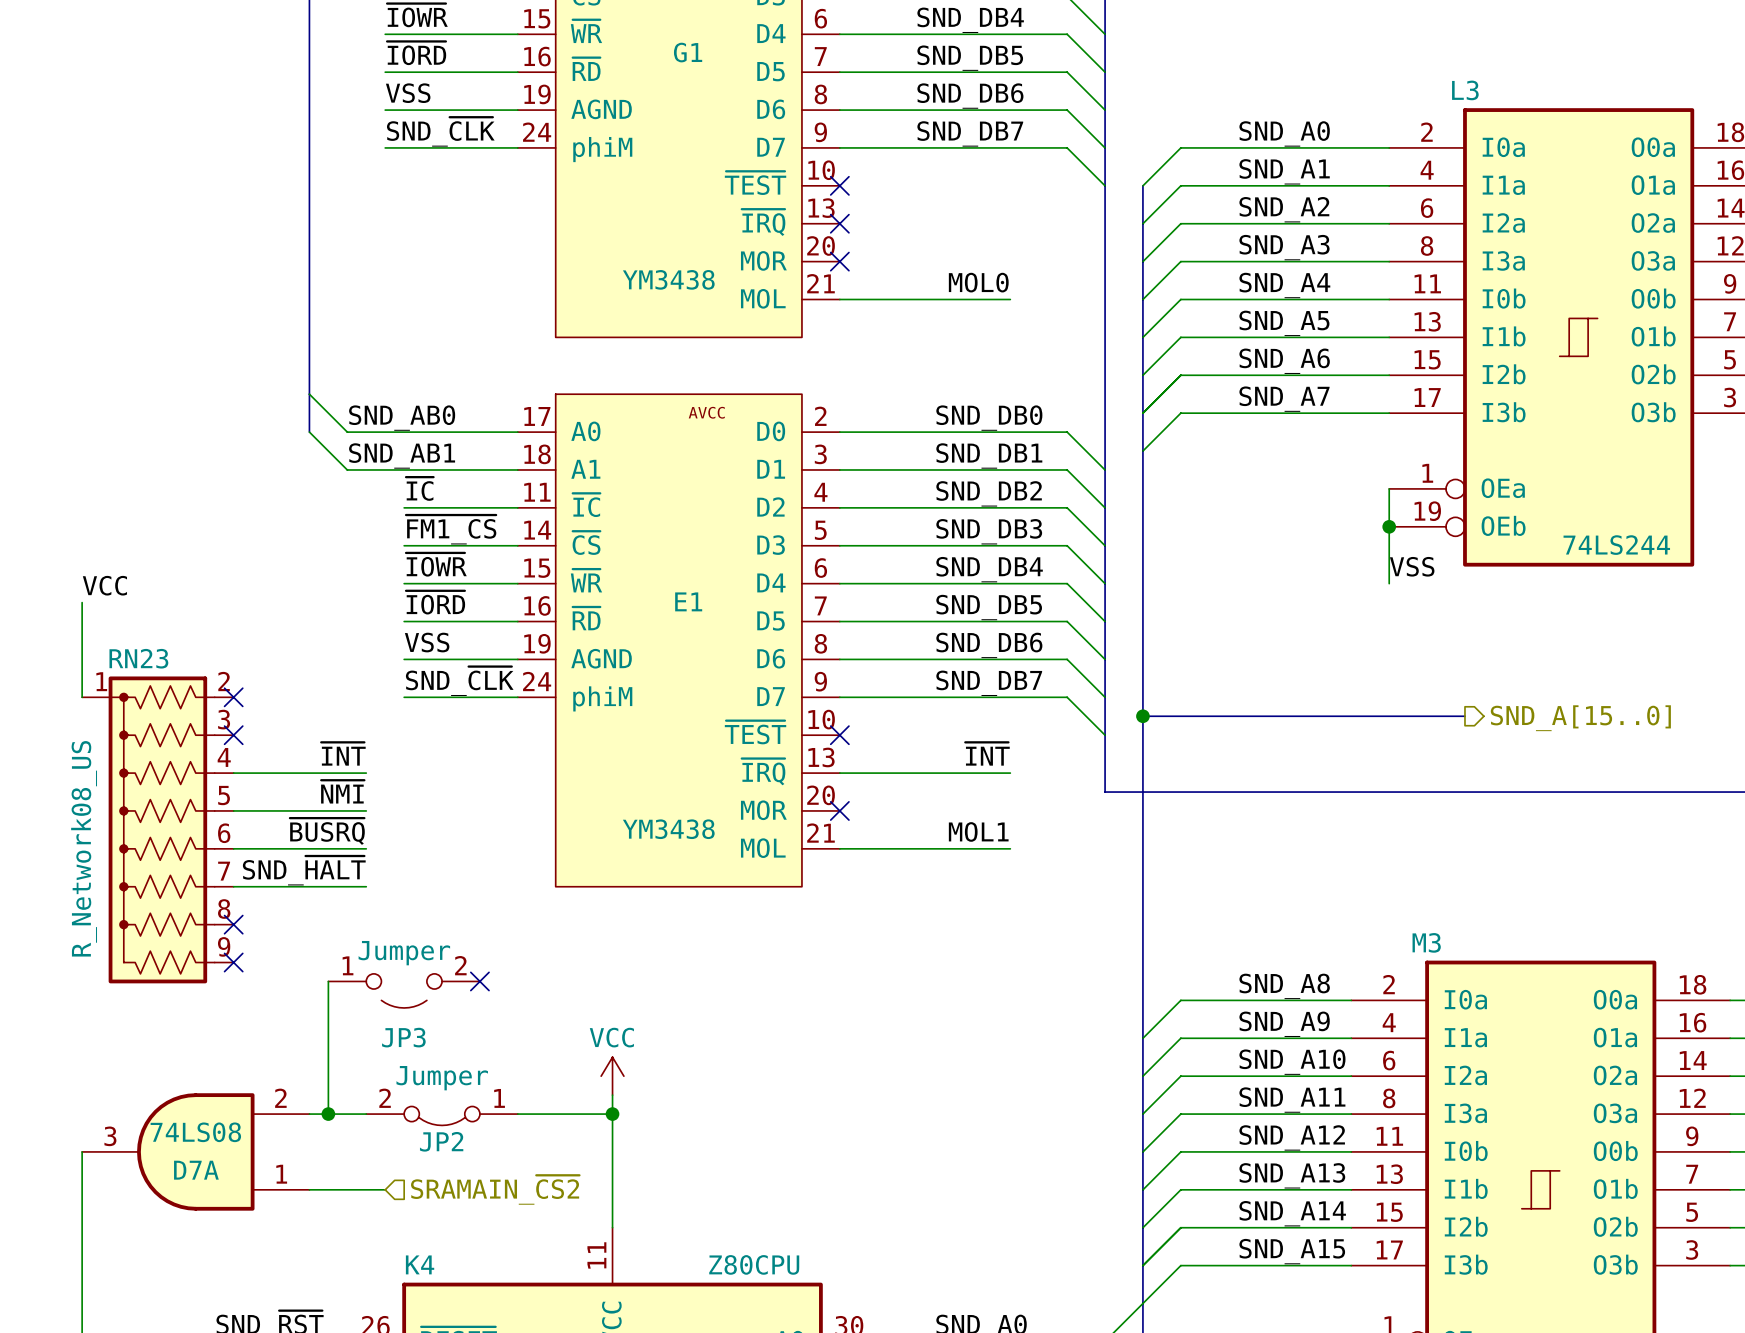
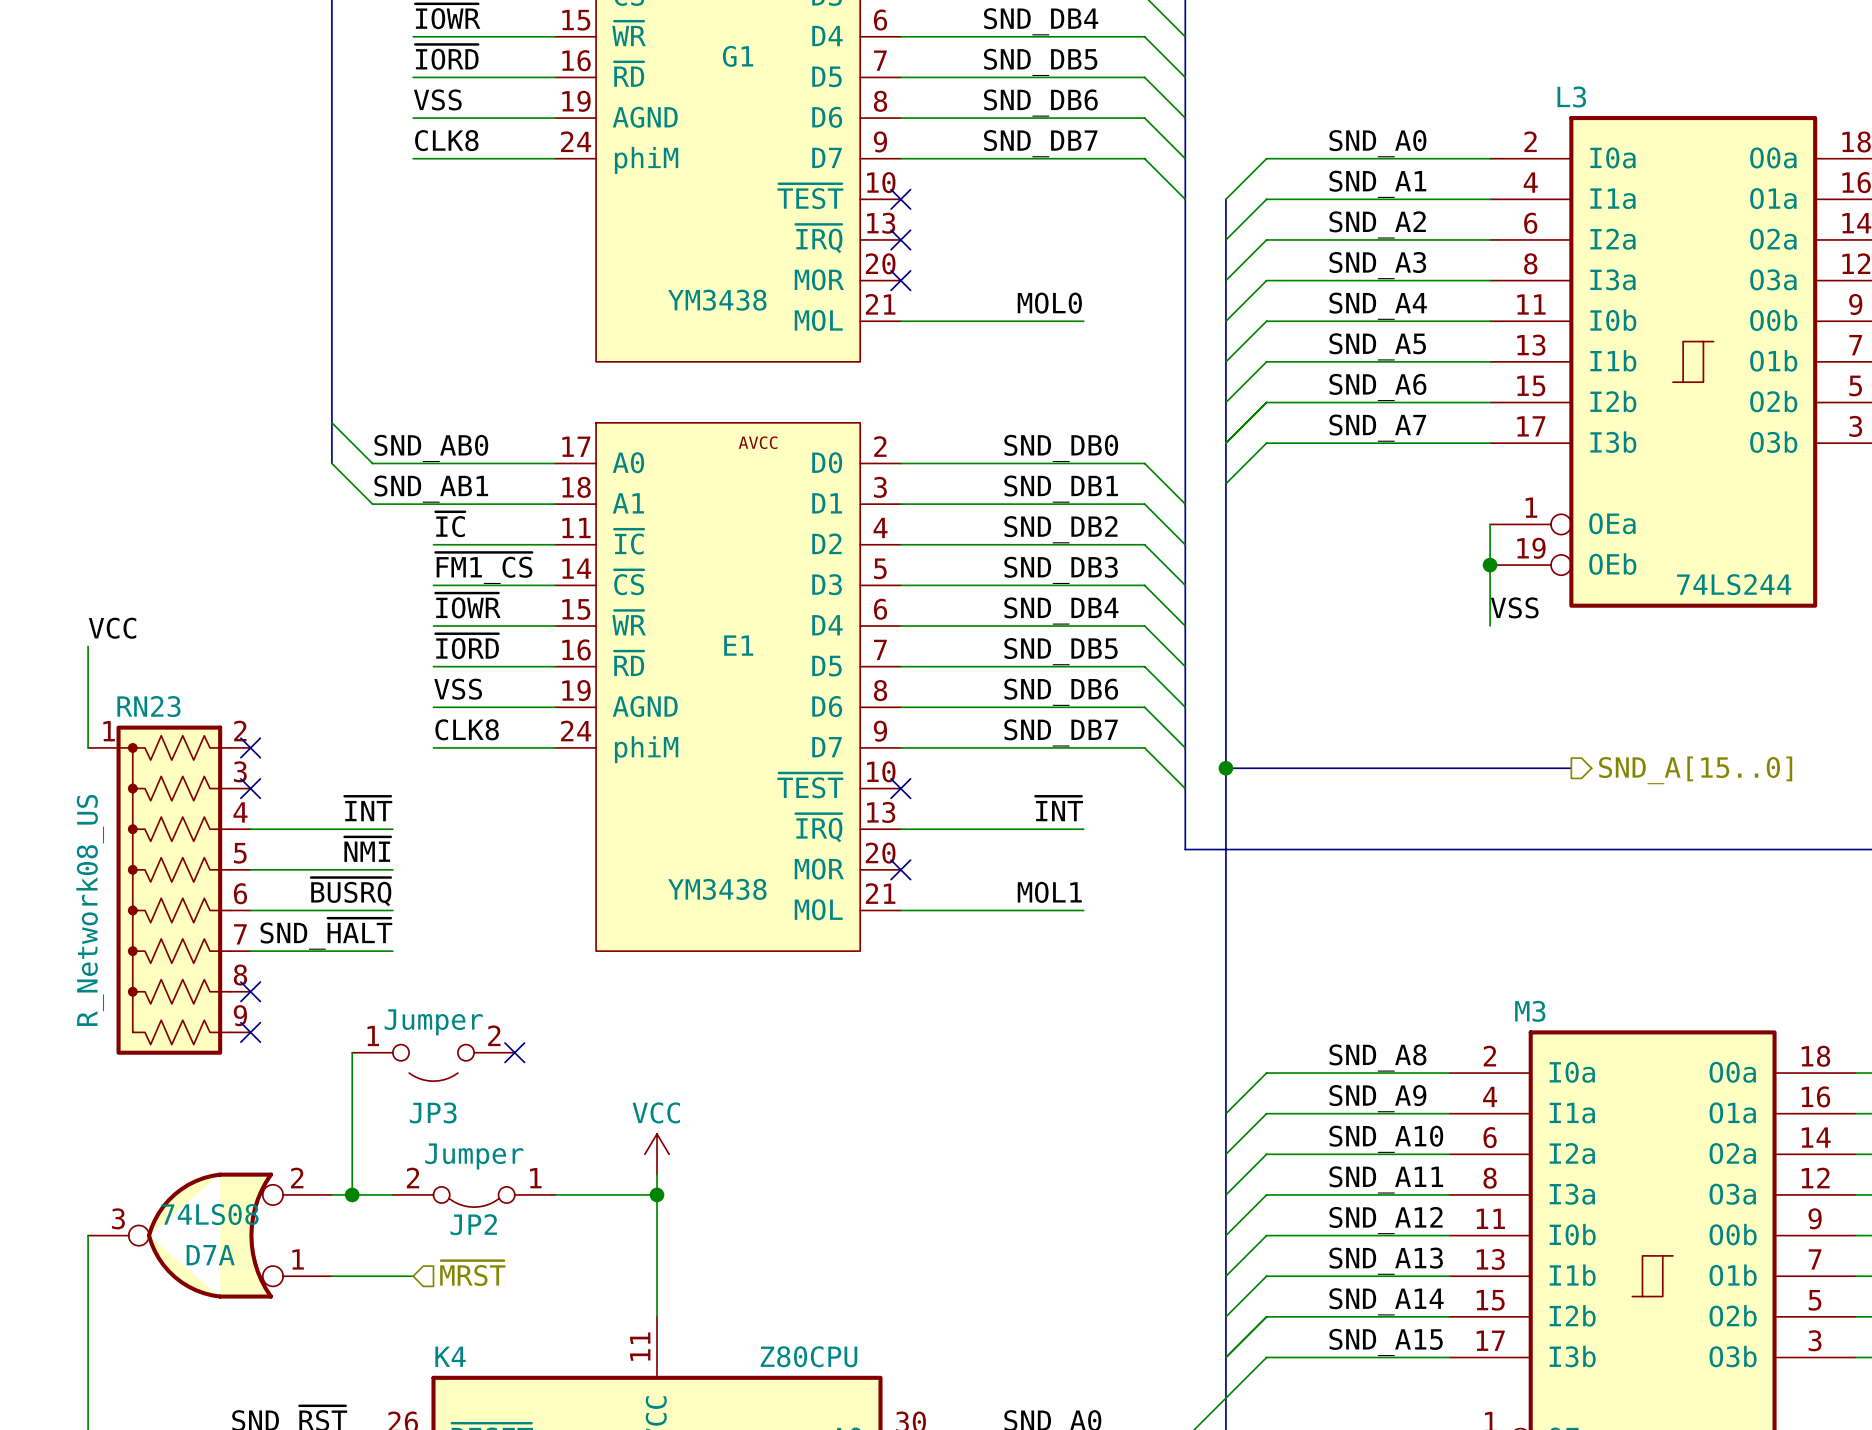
label: SND_~{CLK} (440, 131) -> CLK8 (446, 140)
label: SND_~{CLK} (459, 681) -> CLK8 (467, 729)
D7A symbol: [82, 1093, 310, 1211] -> [88, 1172, 332, 1299]
hierarchical label: SRAMAIN_~{CS2} (495, 1190) -> ~{MRST} (472, 1273)

